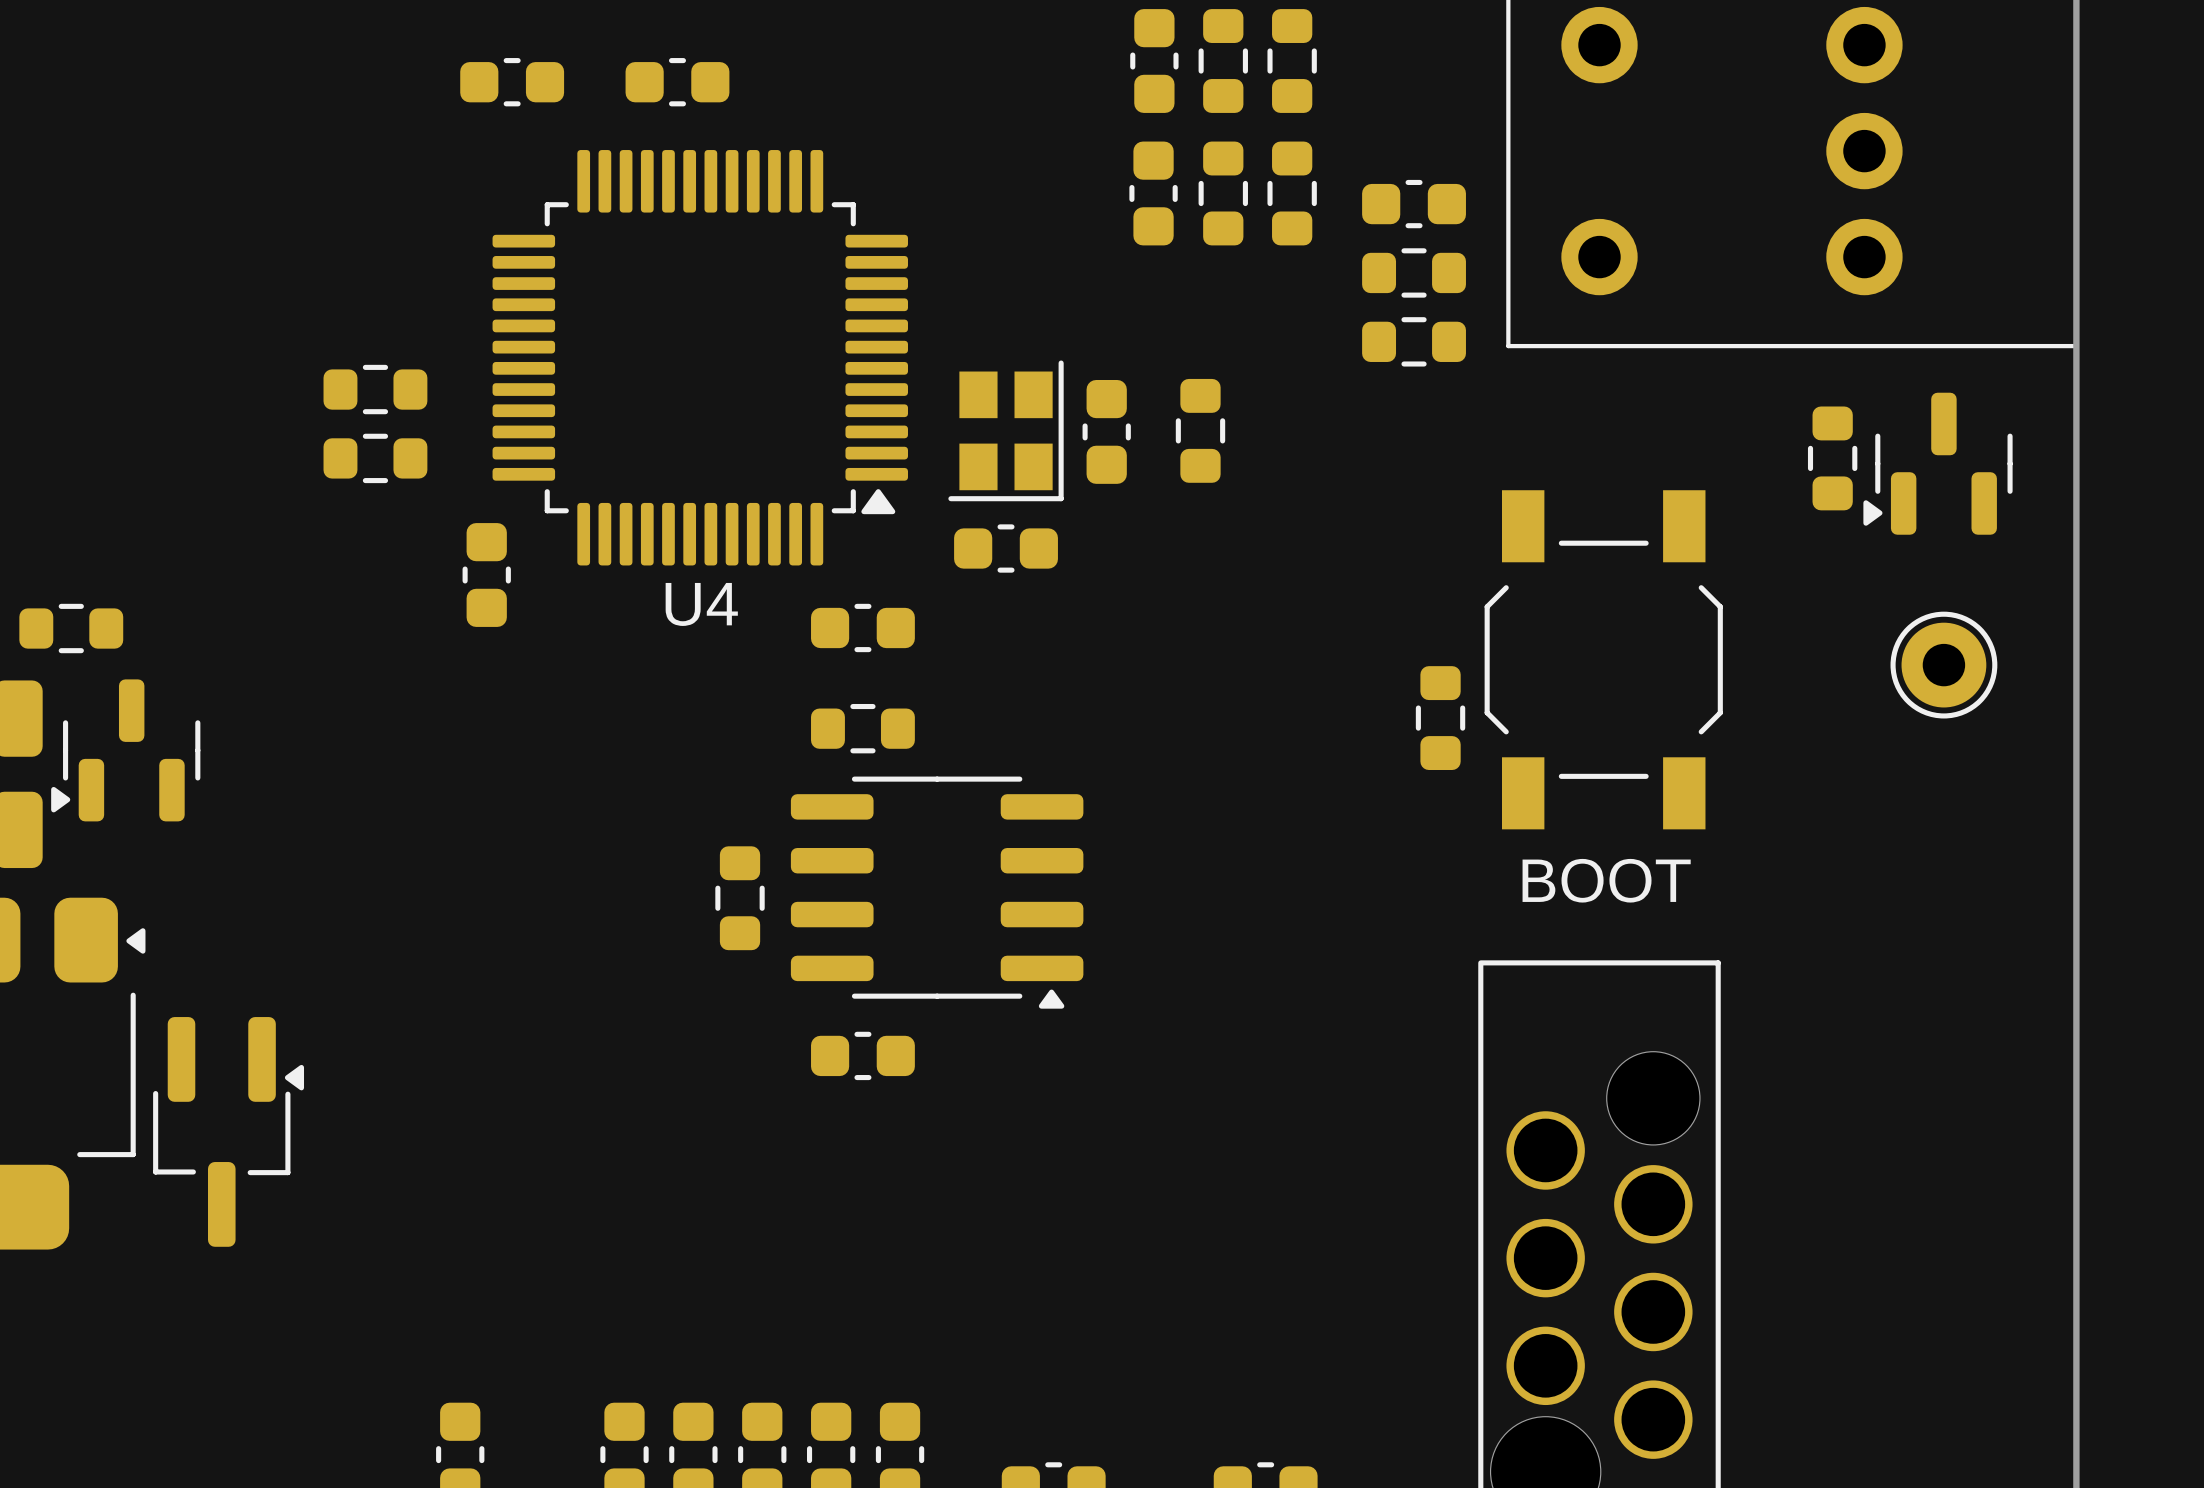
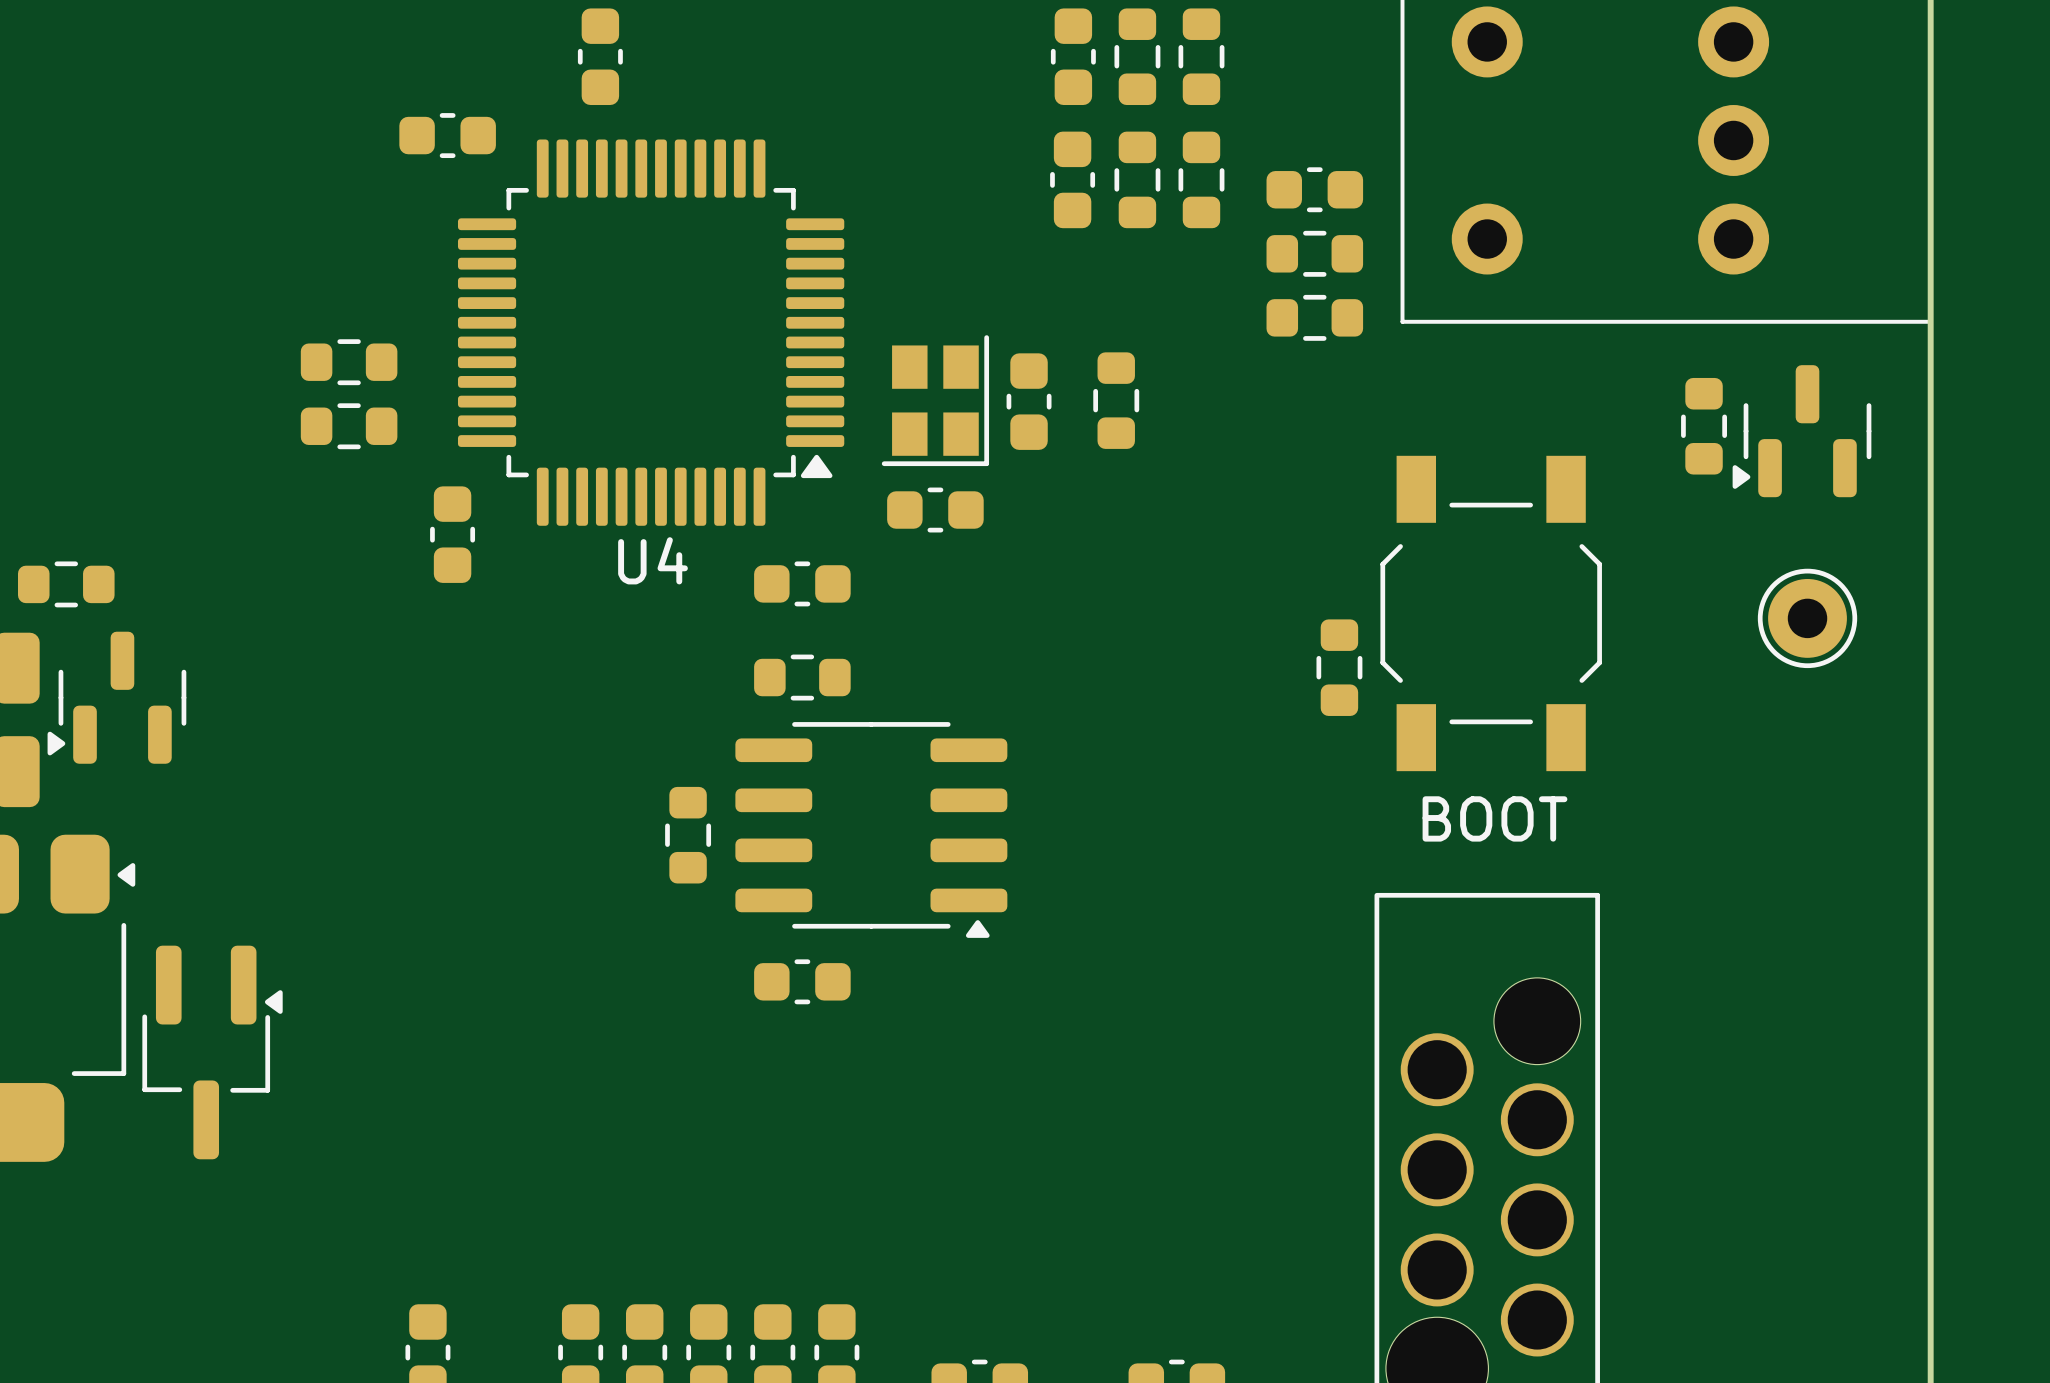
part position: (512, 82) -> (447, 135)
part rotation: 0° (677, 82) -> 90° clockwise (600, 56)

